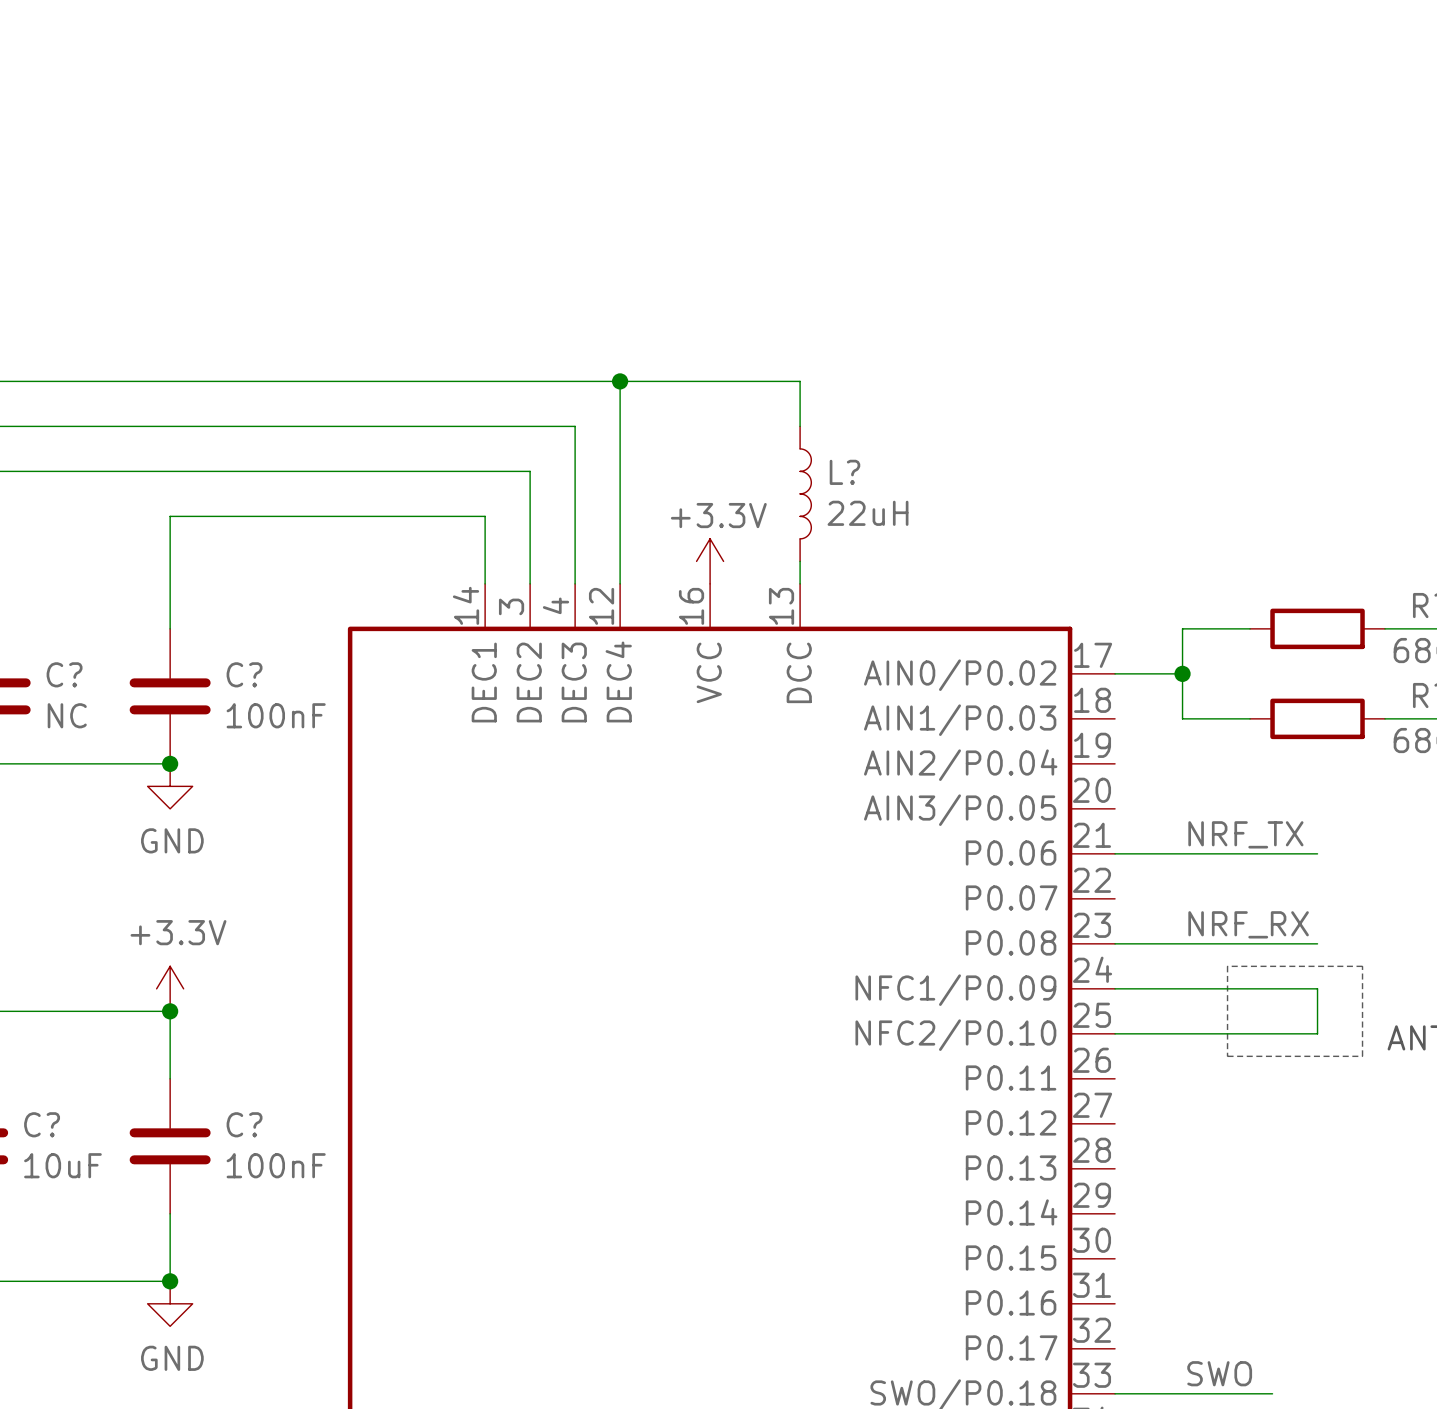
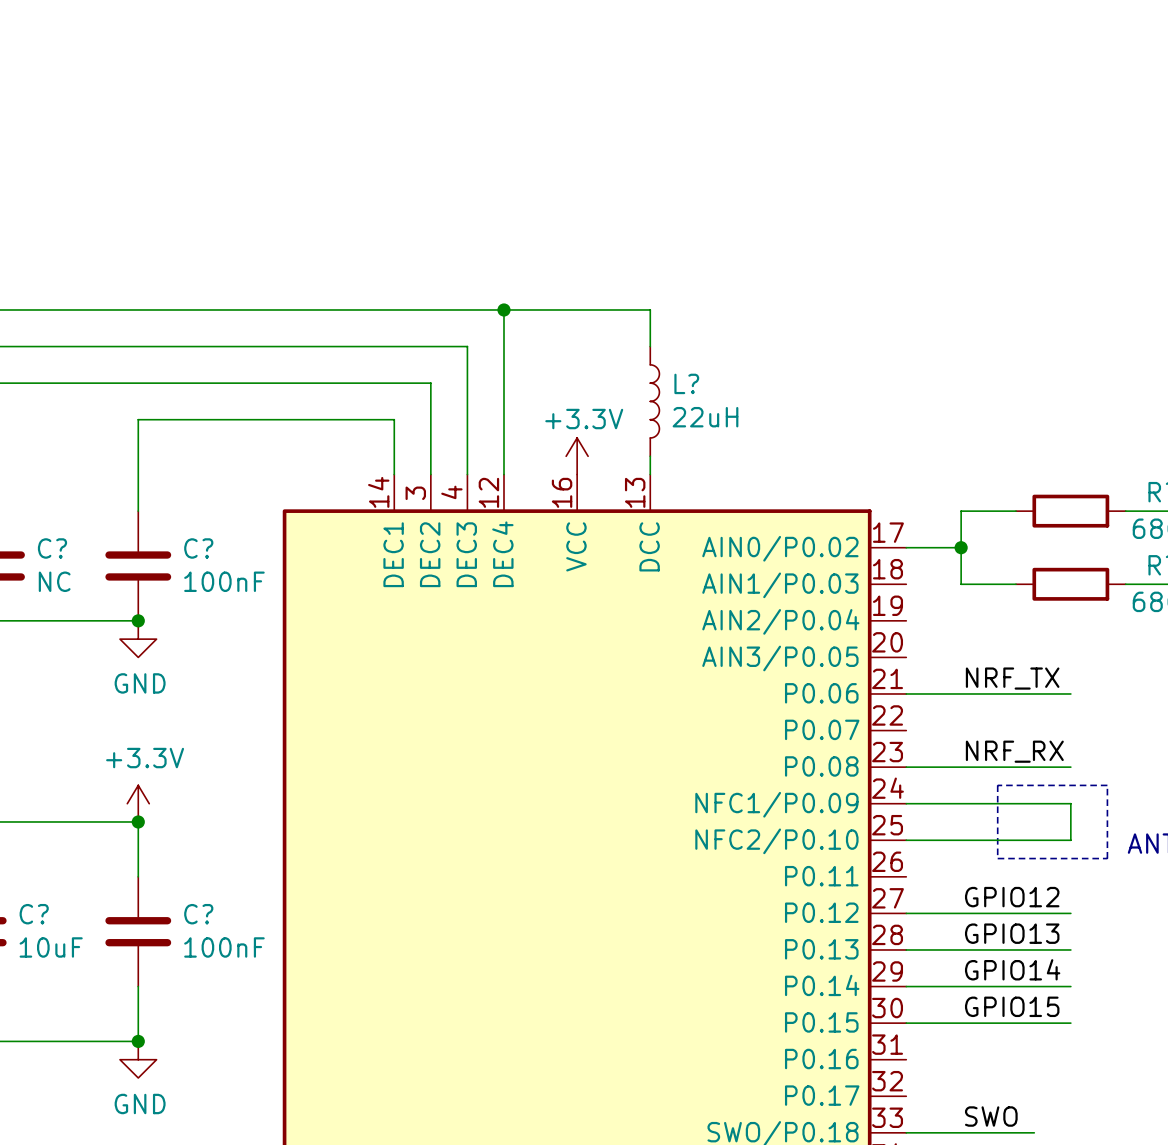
label: none -> GPIO12 (1012, 897)
wire: none -> (906, 913) (1070, 913)
label: none -> GPIO13 (1012, 933)
wire: none -> (906, 949) (1070, 949)
label: none -> GPIO14 (1012, 969)
wire: none -> (906, 986) (1070, 986)
label: none -> GPIO15 (1012, 1006)
wire: none -> (906, 1023) (1070, 1023)

